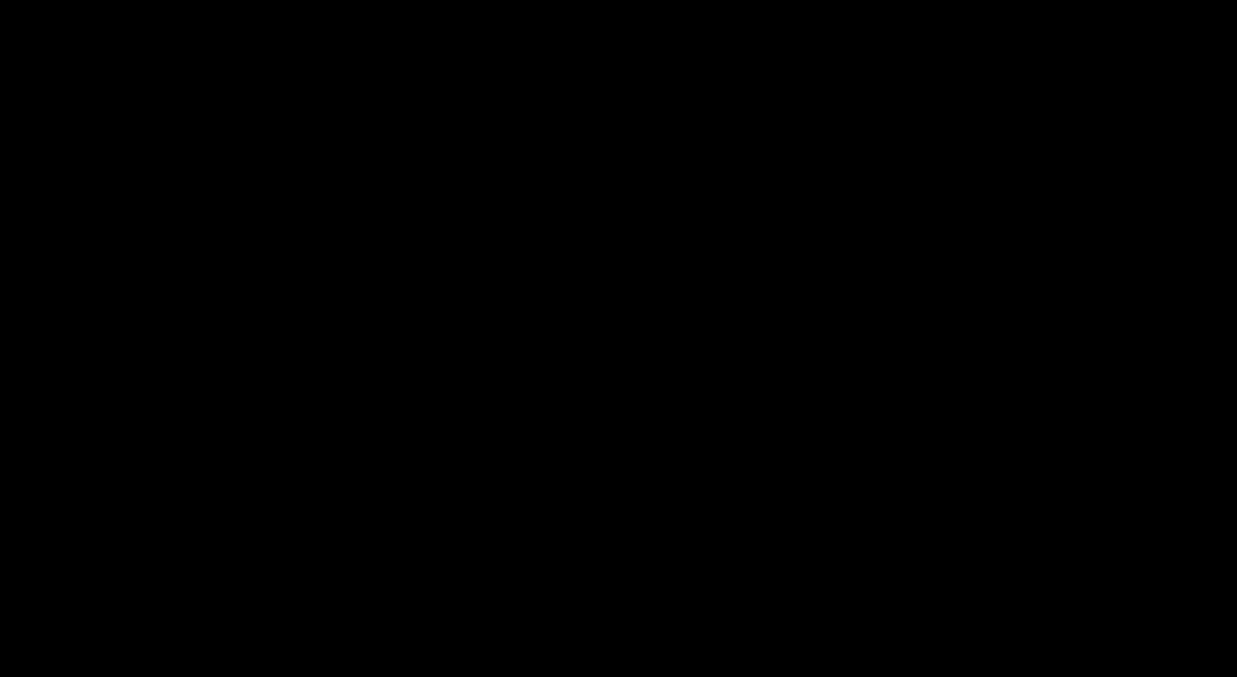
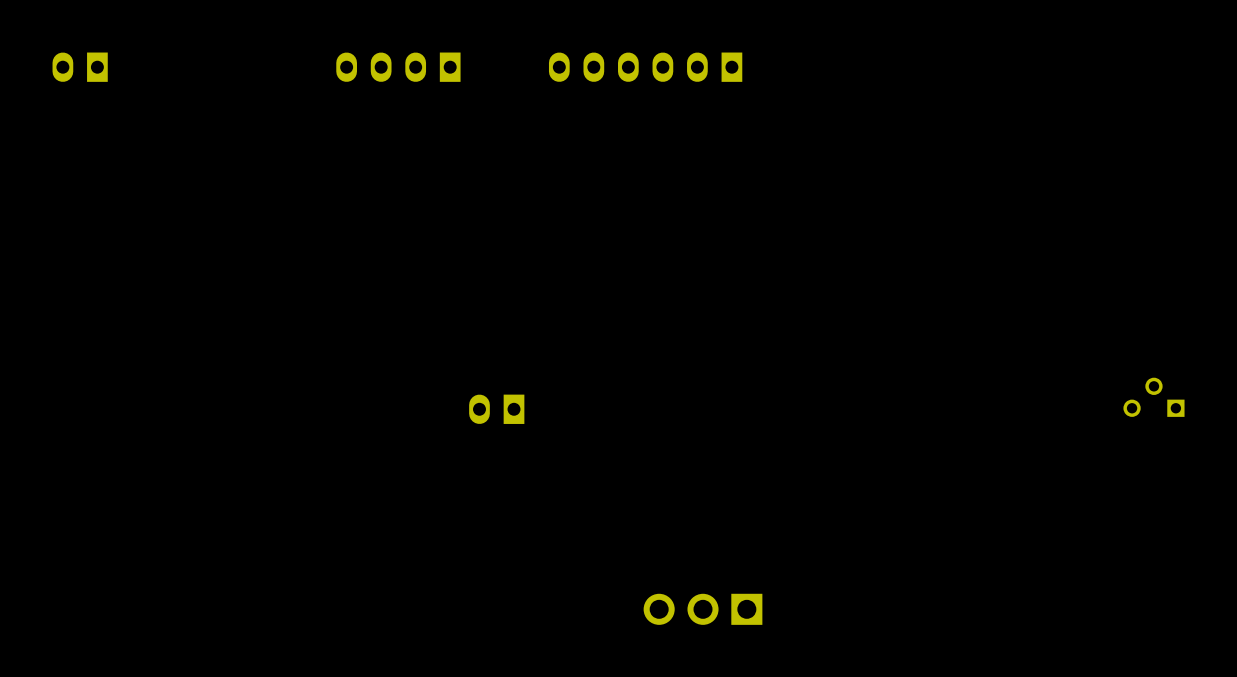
part: none -> (80, 67)
part: none -> (398, 67)
part: none -> (645, 67)
part: none -> (1153, 397)
part: none -> (496, 409)
part: none -> (703, 609)

